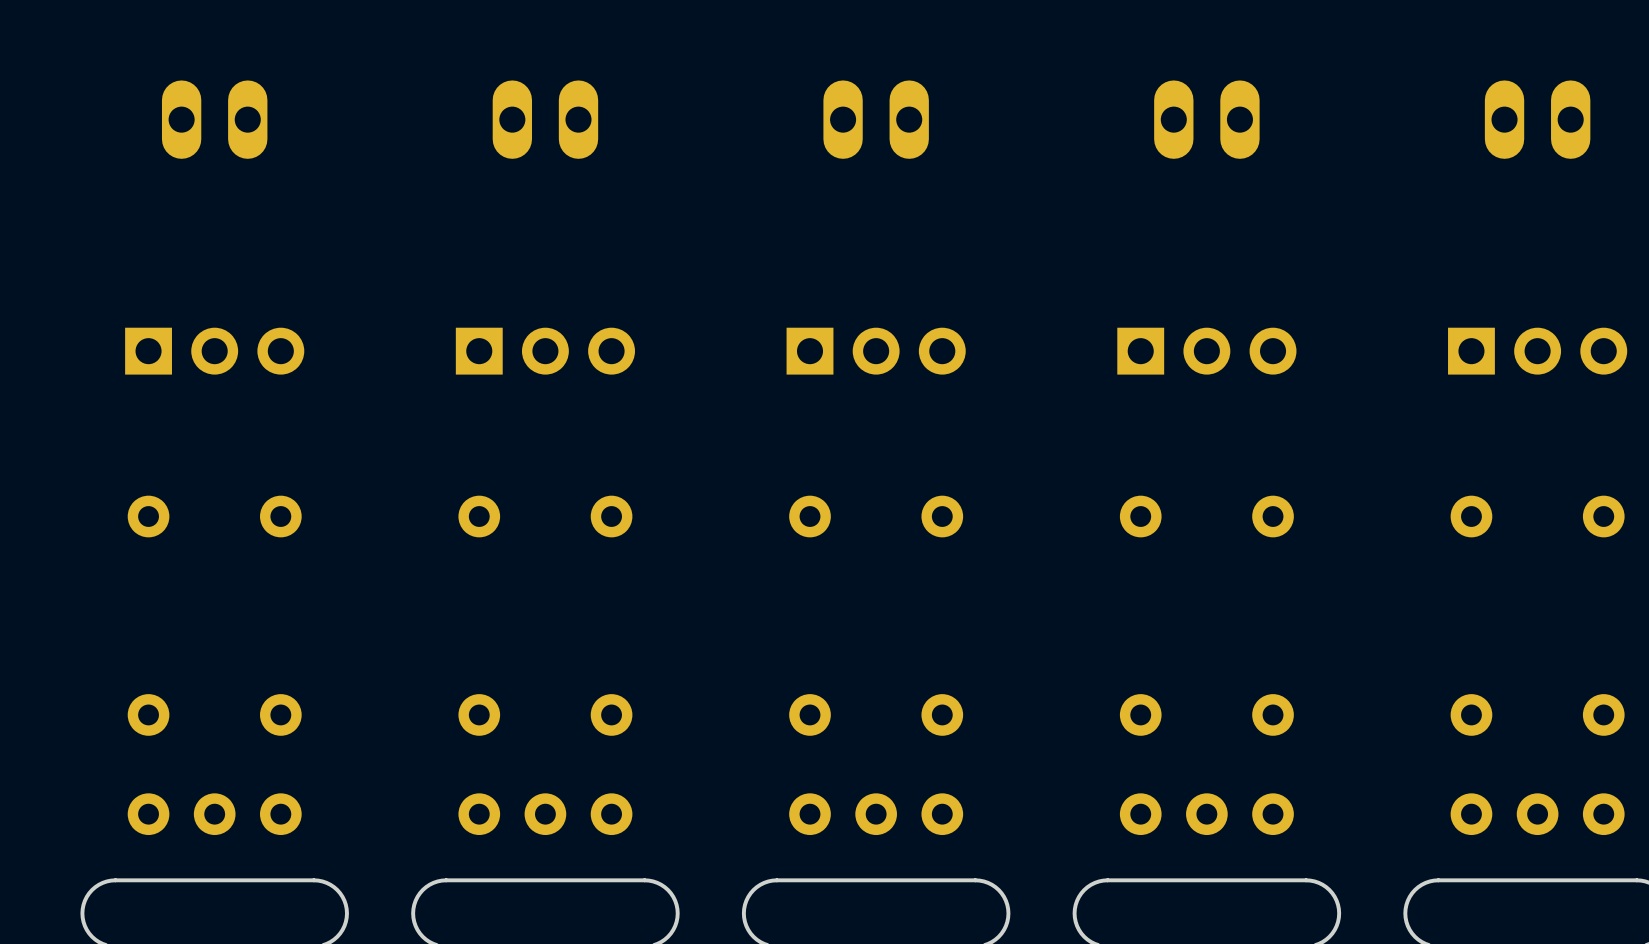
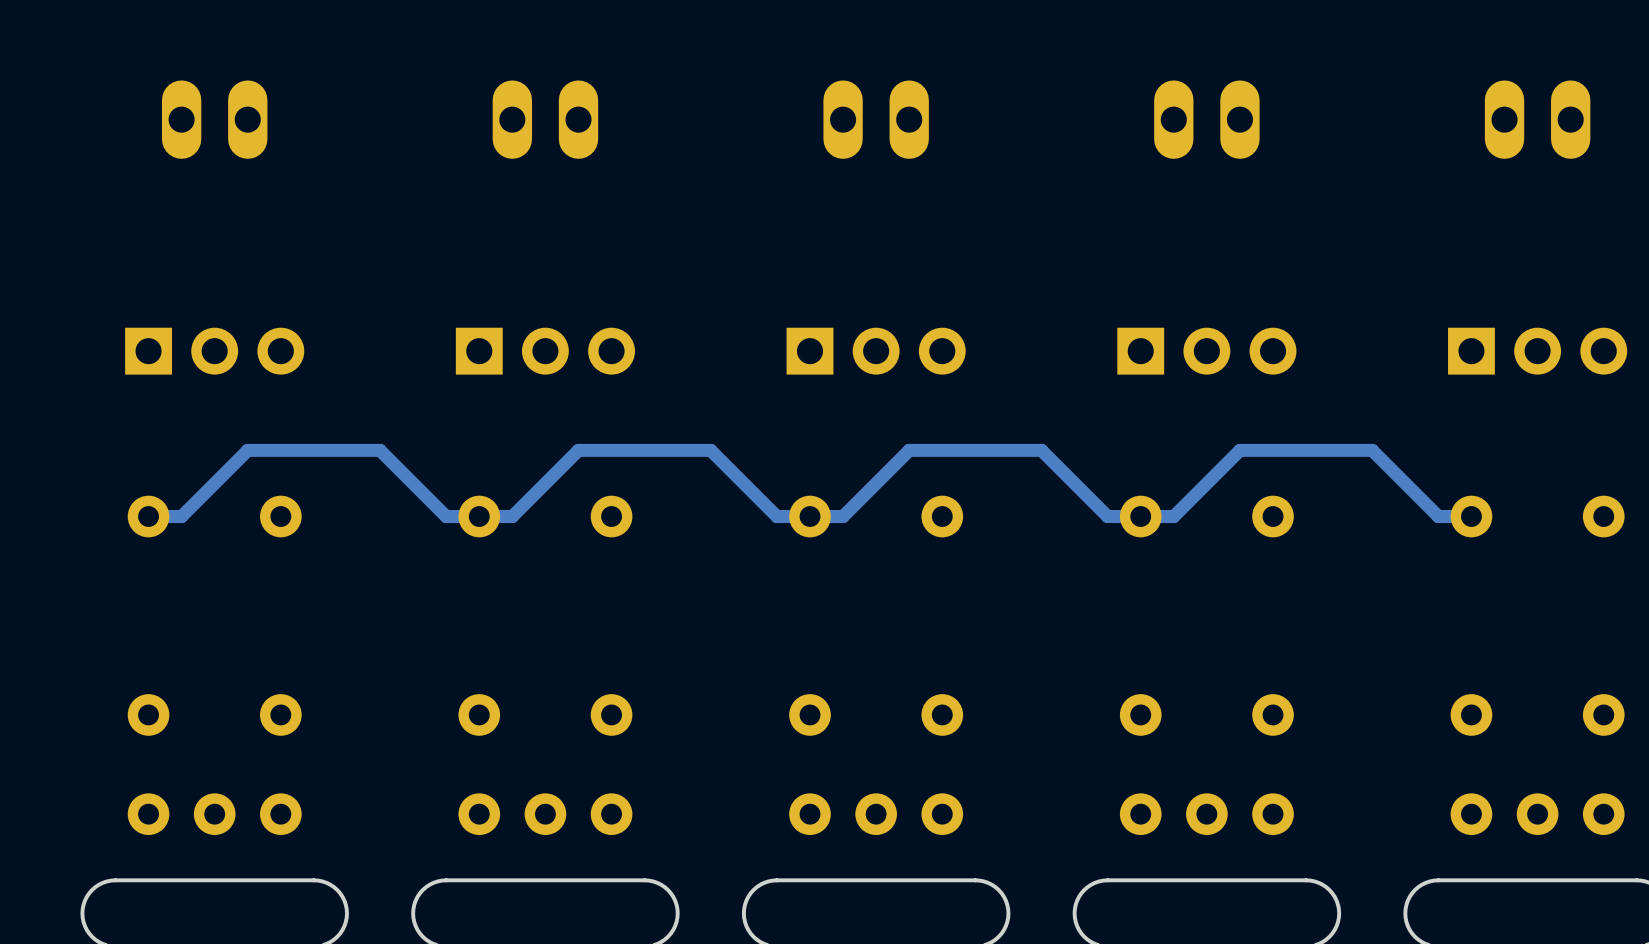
track: none -> (1471, 516) (1438, 516) (1372, 450) (1239, 450) (1173, 516) (1107, 516) (1041, 450) (909, 450) (843, 516) (776, 516) (710, 450) (578, 450) (512, 516) (446, 516) (380, 450) (247, 450) (181, 516) (148, 516)

